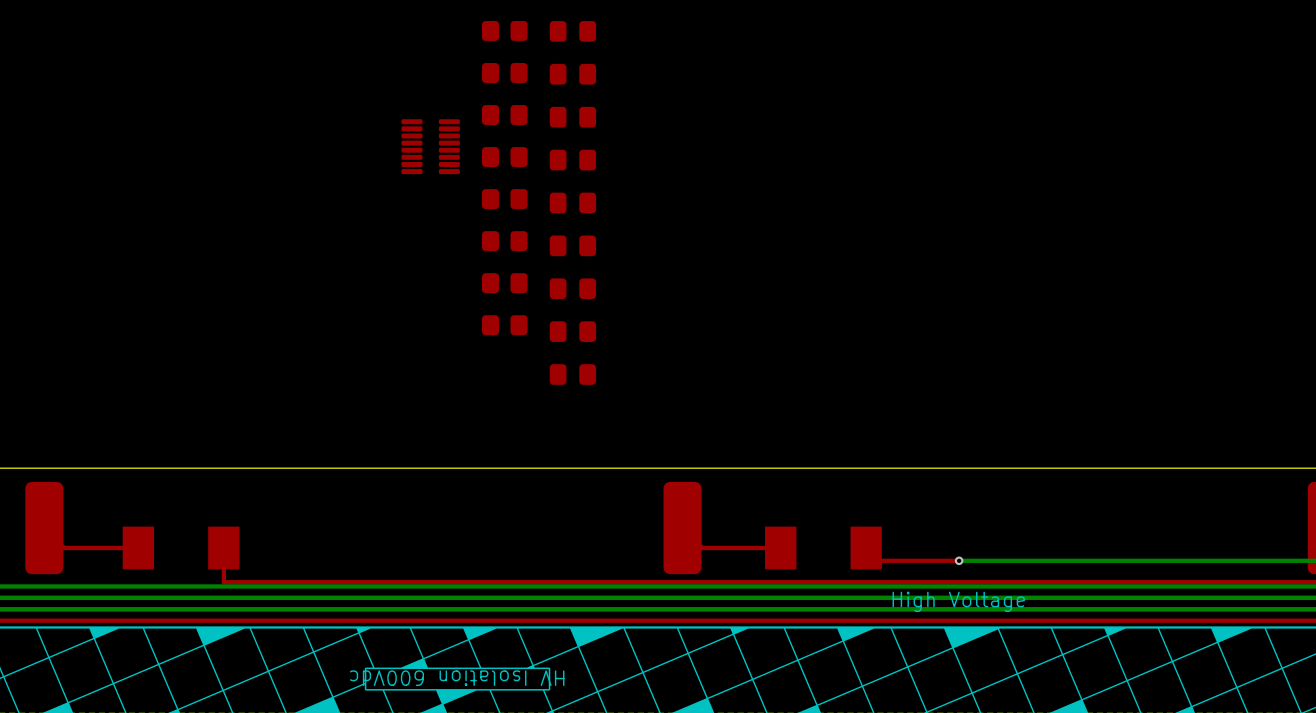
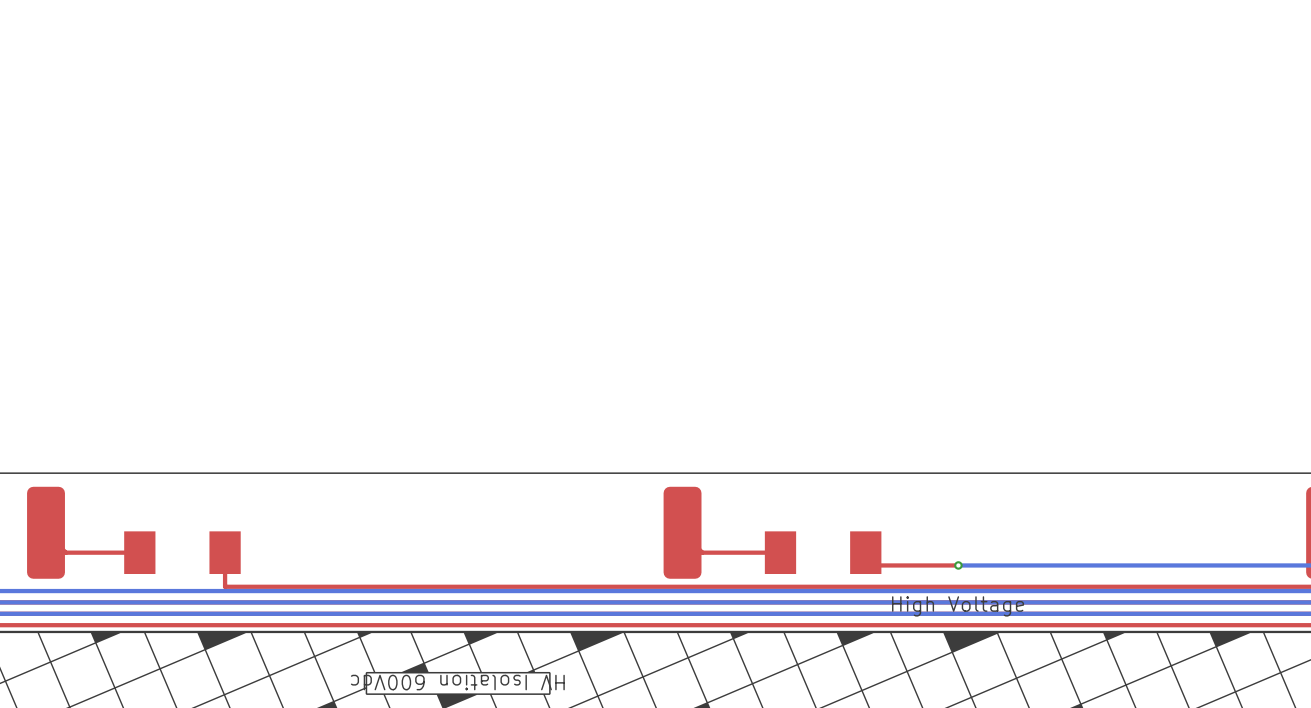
part: (504, 30) -> none
part: (572, 31) -> none
part: (504, 72) -> none
part: (572, 74) -> none
part: (504, 115) -> none
part: (572, 117) -> none
part: (430, 146) -> none
part: (504, 157) -> none
part: (572, 160) -> none
part: (504, 199) -> none
part: (572, 202) -> none
part: (504, 241) -> none
part: (572, 245) -> none
part: (504, 283) -> none
part: (572, 288) -> none
part: (504, 325) -> none
part: (572, 331) -> none
part: (572, 374) -> none

